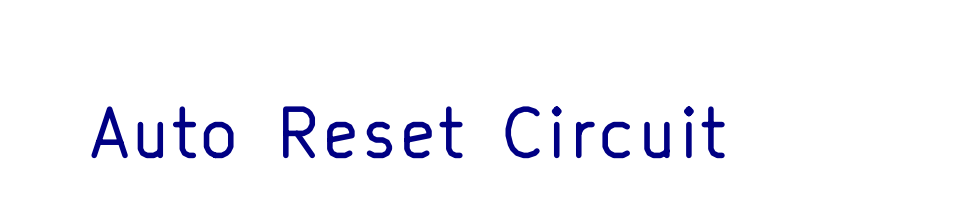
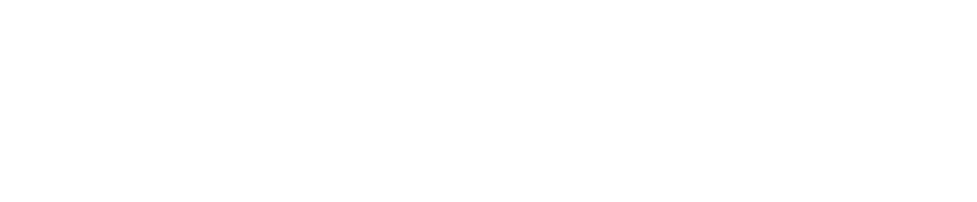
text: Auto Reset Circuit (408, 132) -> none

